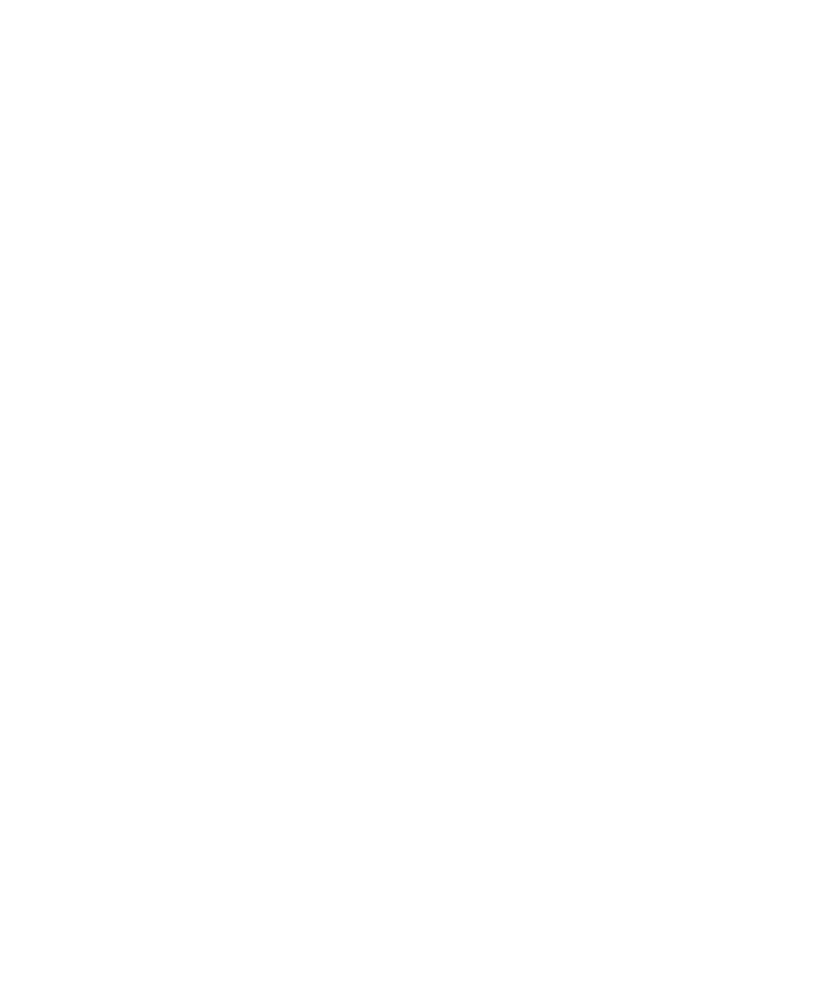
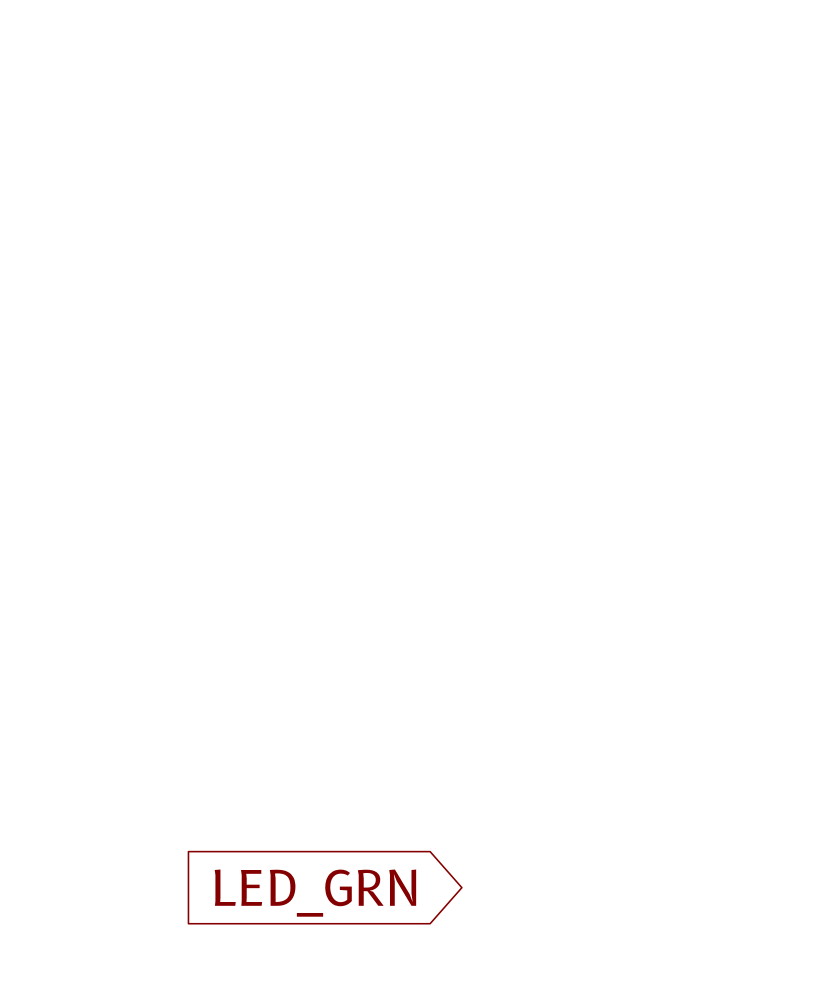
global label: none -> LED_GRN (315, 893)

